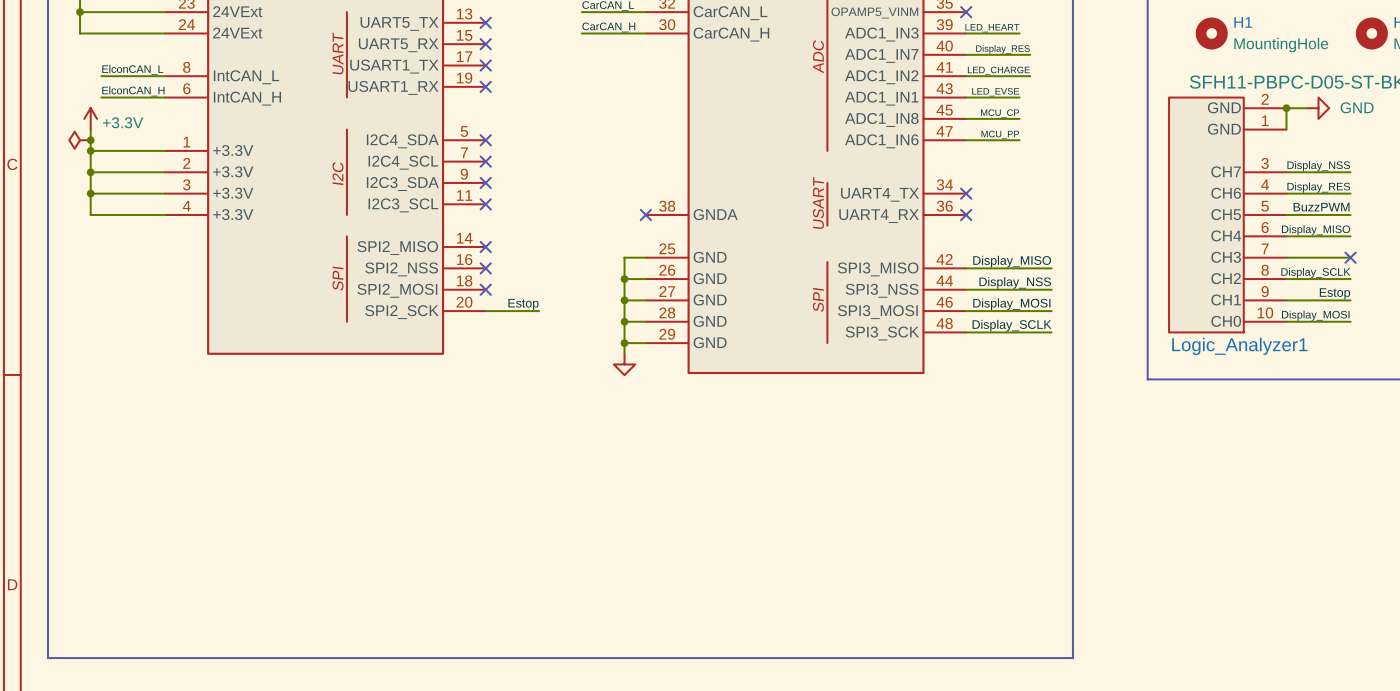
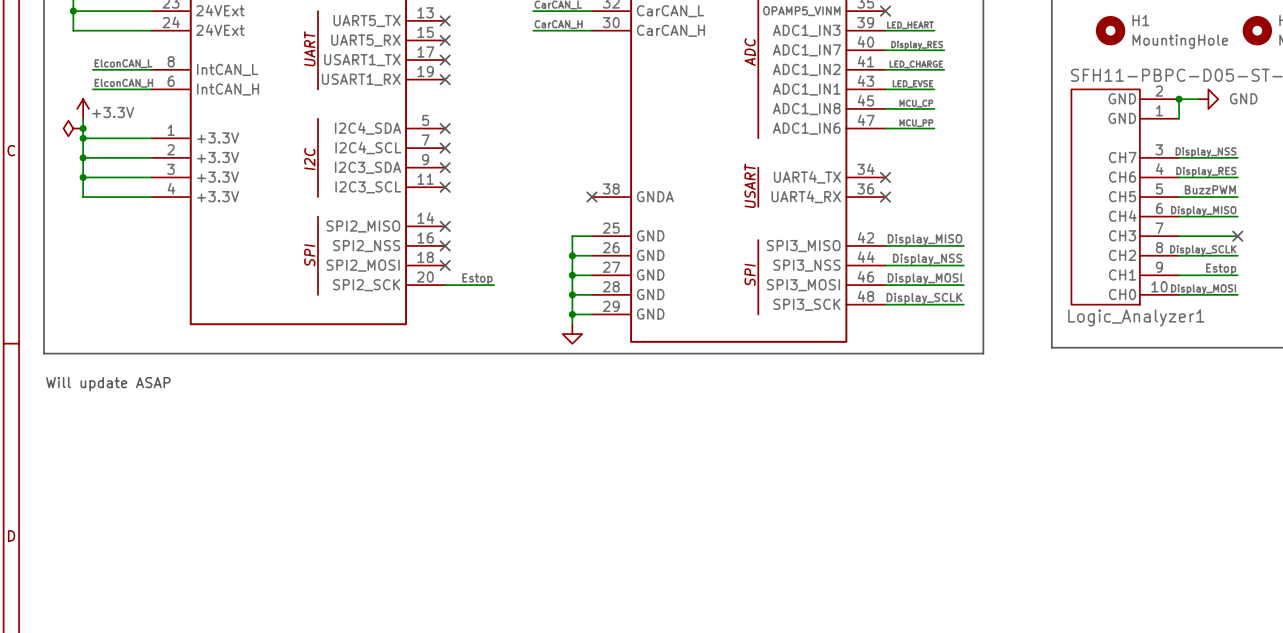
line: (48, 385) (48, 658) (1072, 658) (1072, 385) -> (43, 353) (983, 353)
text: none -> Will update ASAP (108, 384)

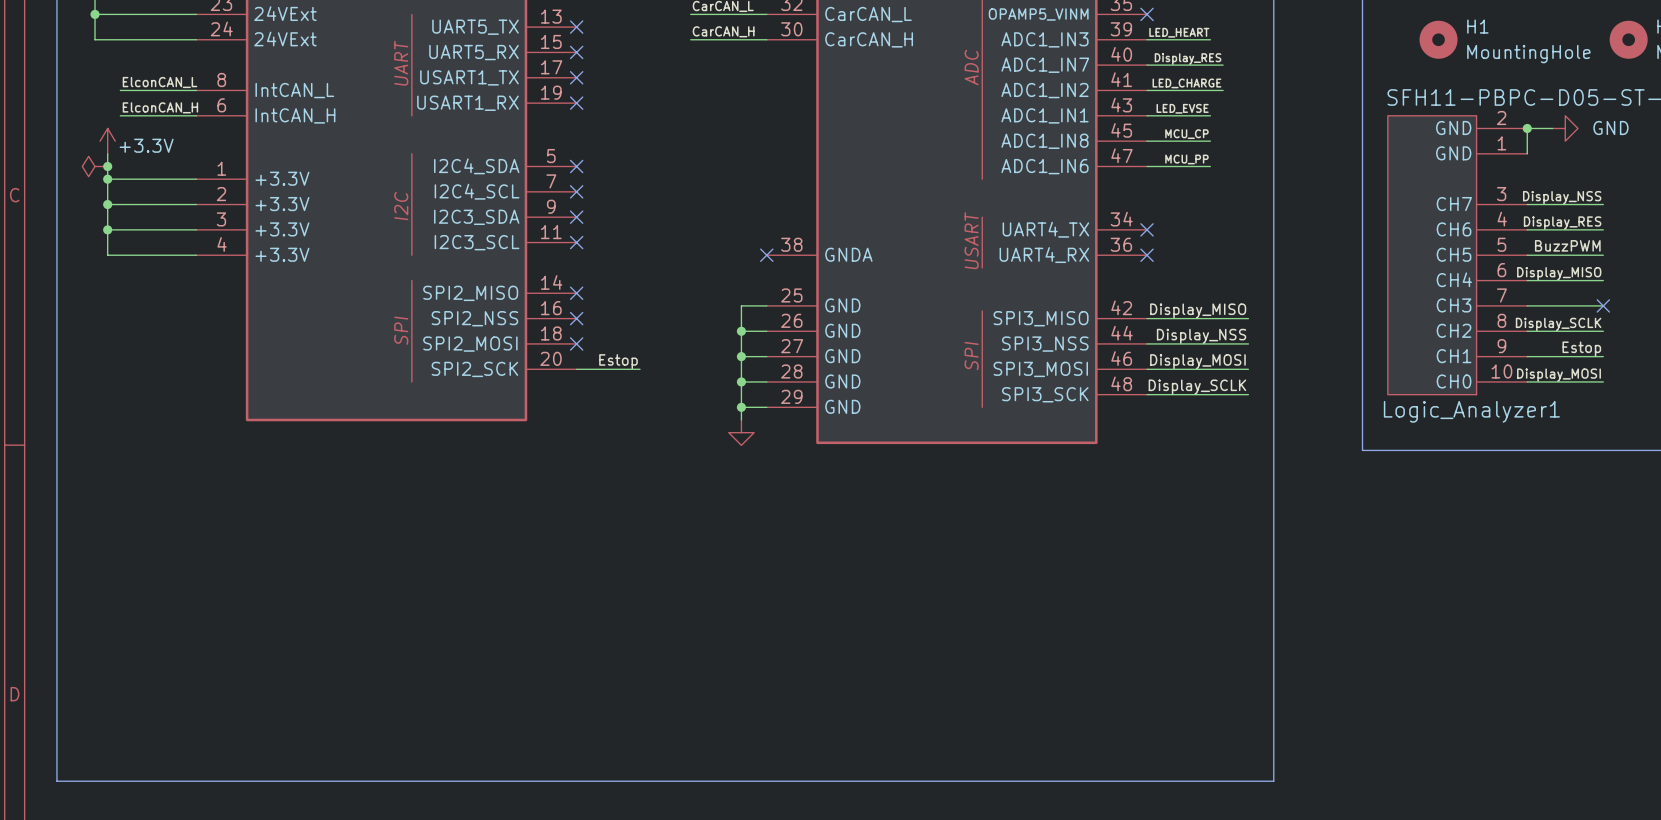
line: (43, 353) (983, 353) -> (56, 458) (56, 781) (1273, 781) (1273, 458)
text: Will update ASAP (108, 384) -> none

